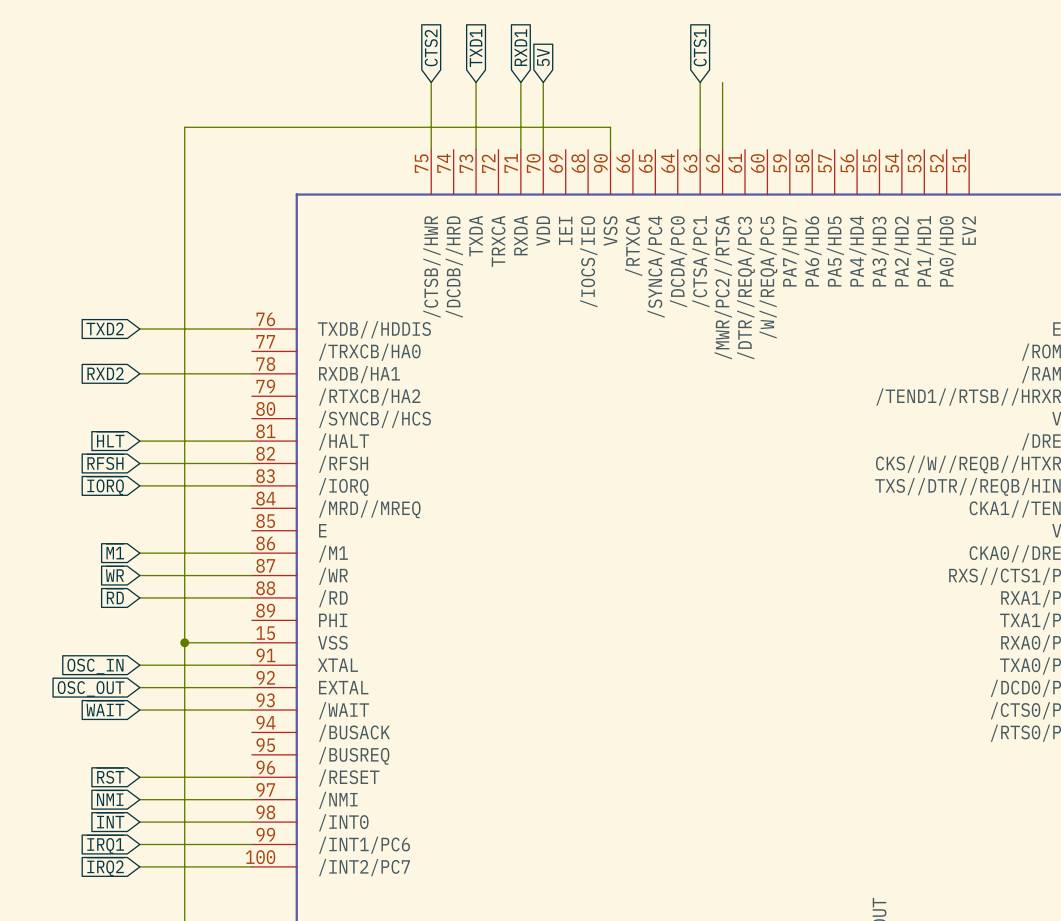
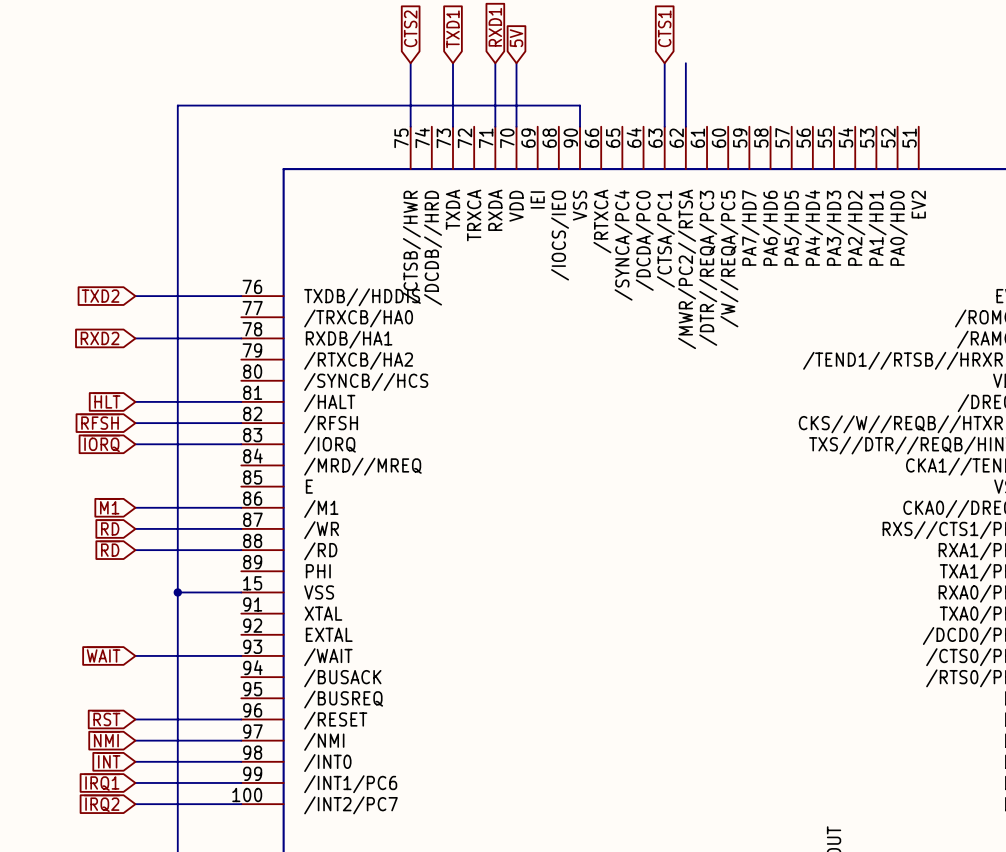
global label: ~{WR} (114, 574) -> ~{RD} (109, 527)
wire: (139, 665) (251, 665) -> none
global label: OSC_IN (95, 666) -> none
wire: (139, 687) (251, 687) -> none
global label: OSC_OUT (91, 689) -> none

